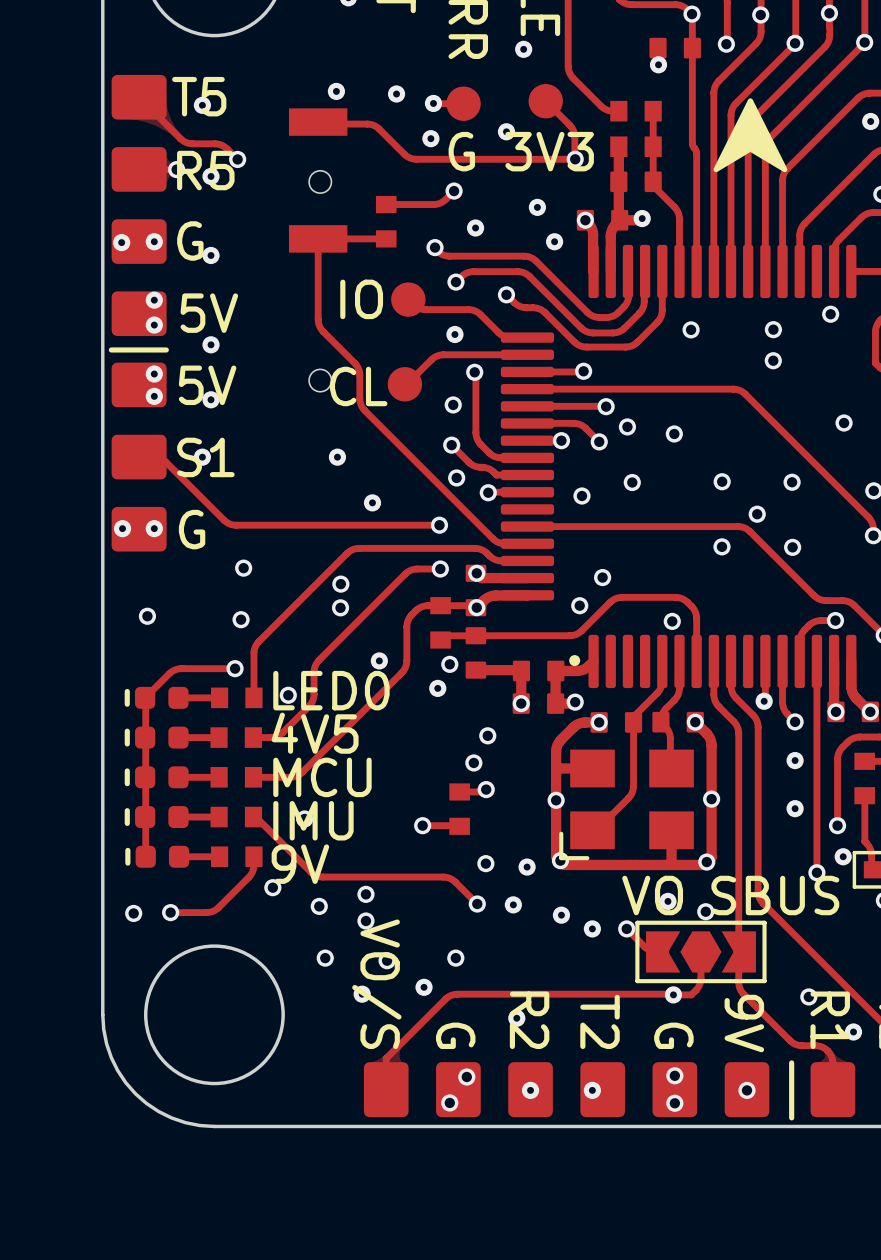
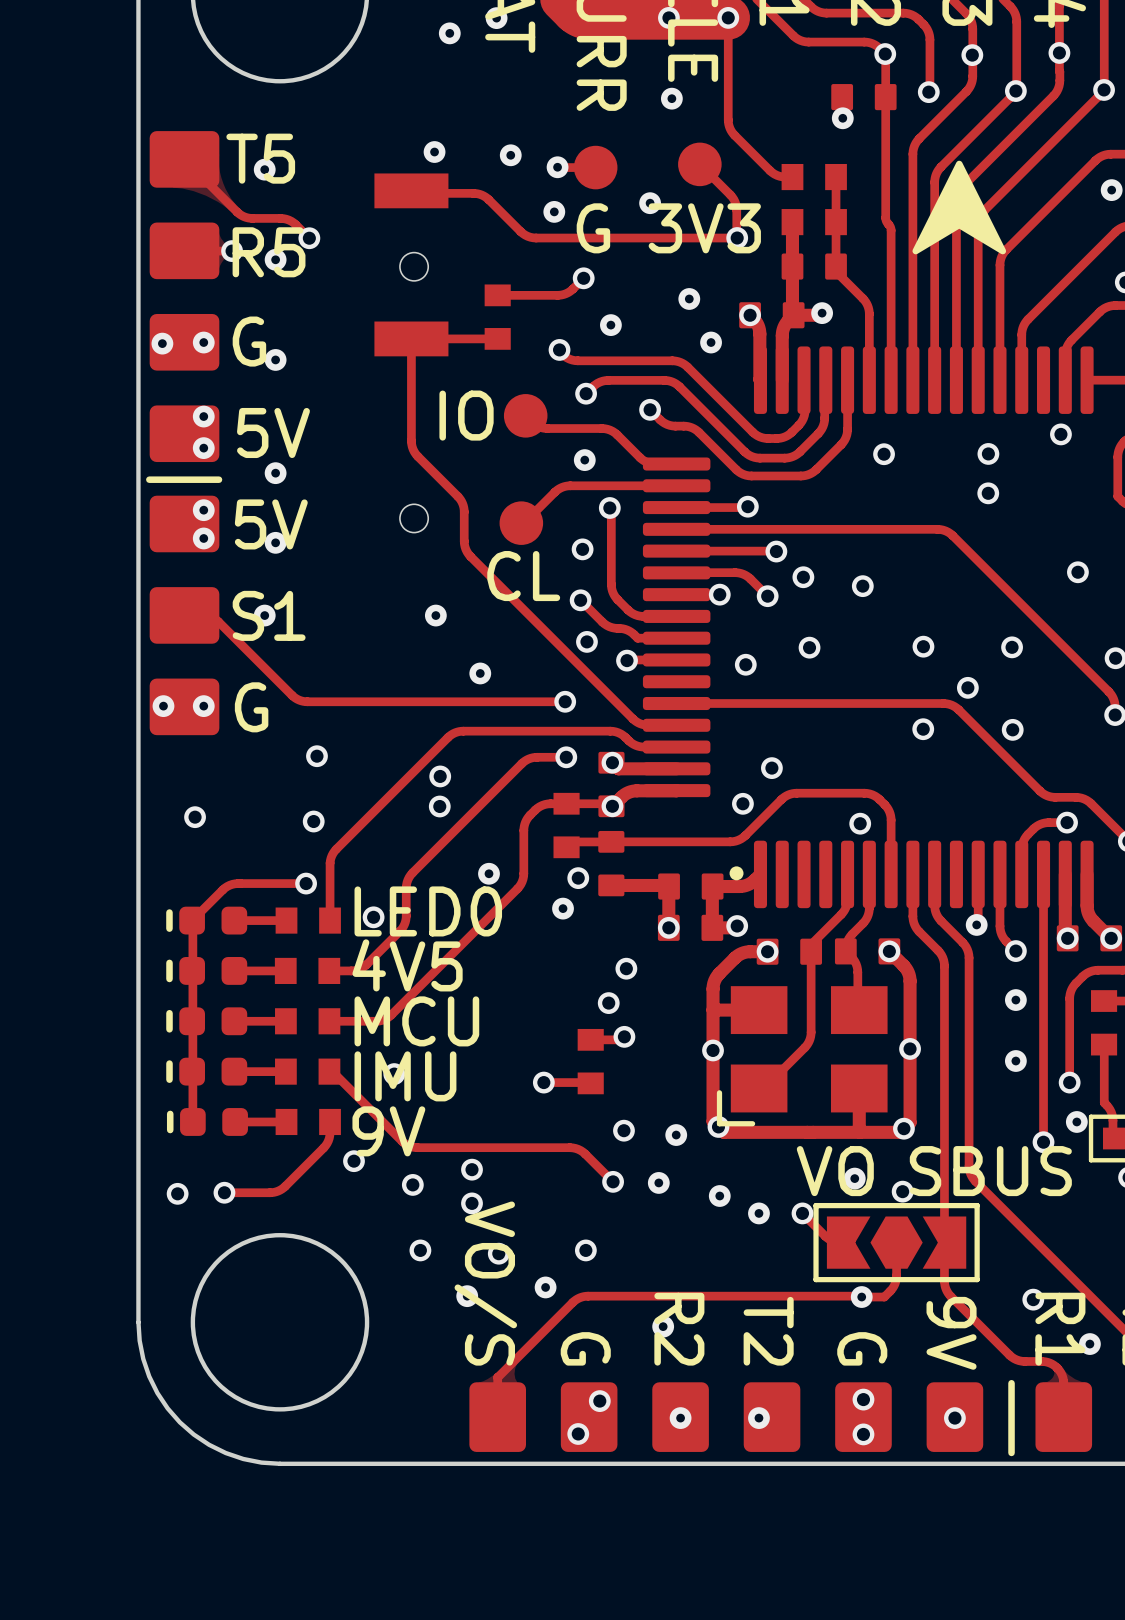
text position: CL (358, 386) -> CL (523, 576)

